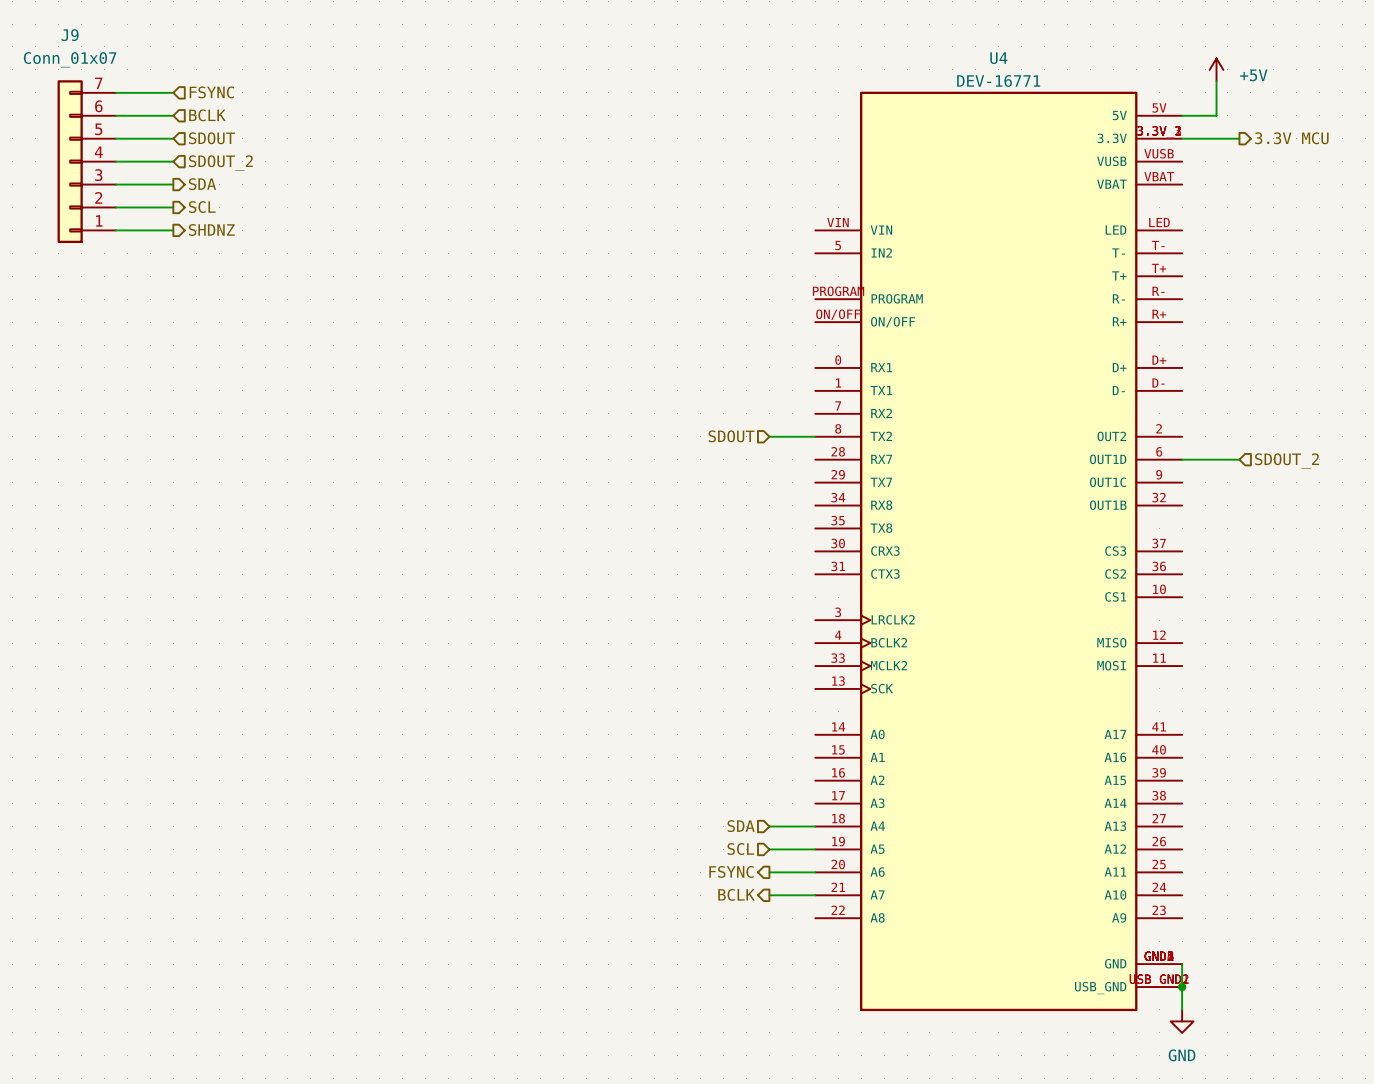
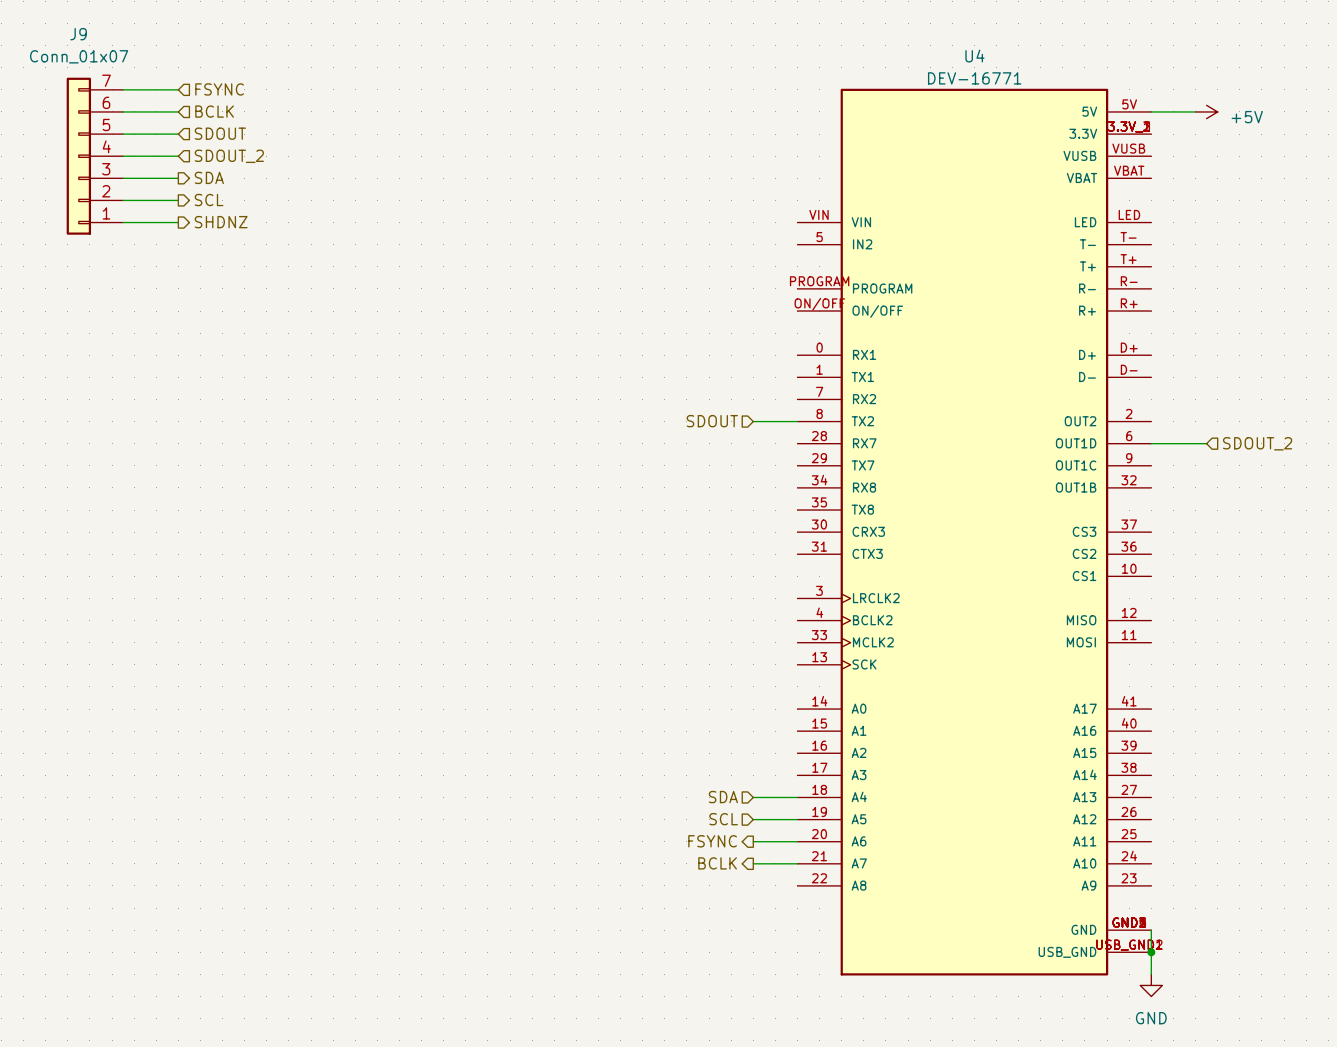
power symbol rotation: 0° (1216, 69) -> 90° clockwise (1206, 111)
power symbol position: +5V (1216, 69) -> +5V (1206, 111)
wire: (1216, 81) (1216, 115) -> (1195, 111) (1184, 111)
wire: (1182, 138) (1239, 138) -> none
hierarchical label: 3.3V MCU (1291, 138) -> none

